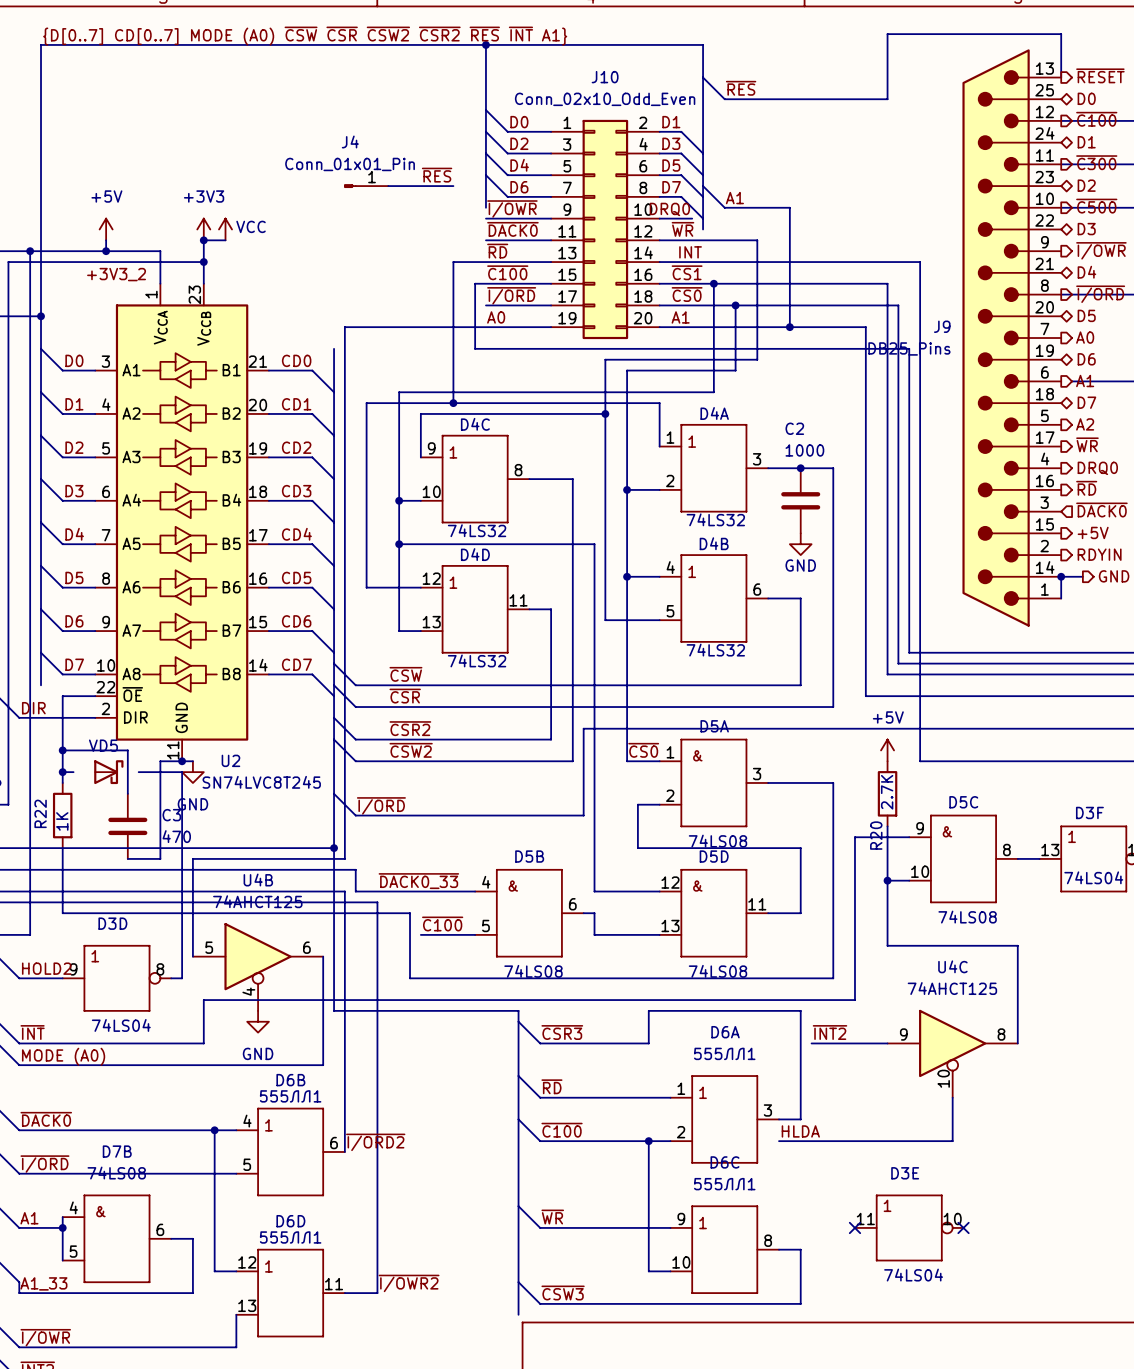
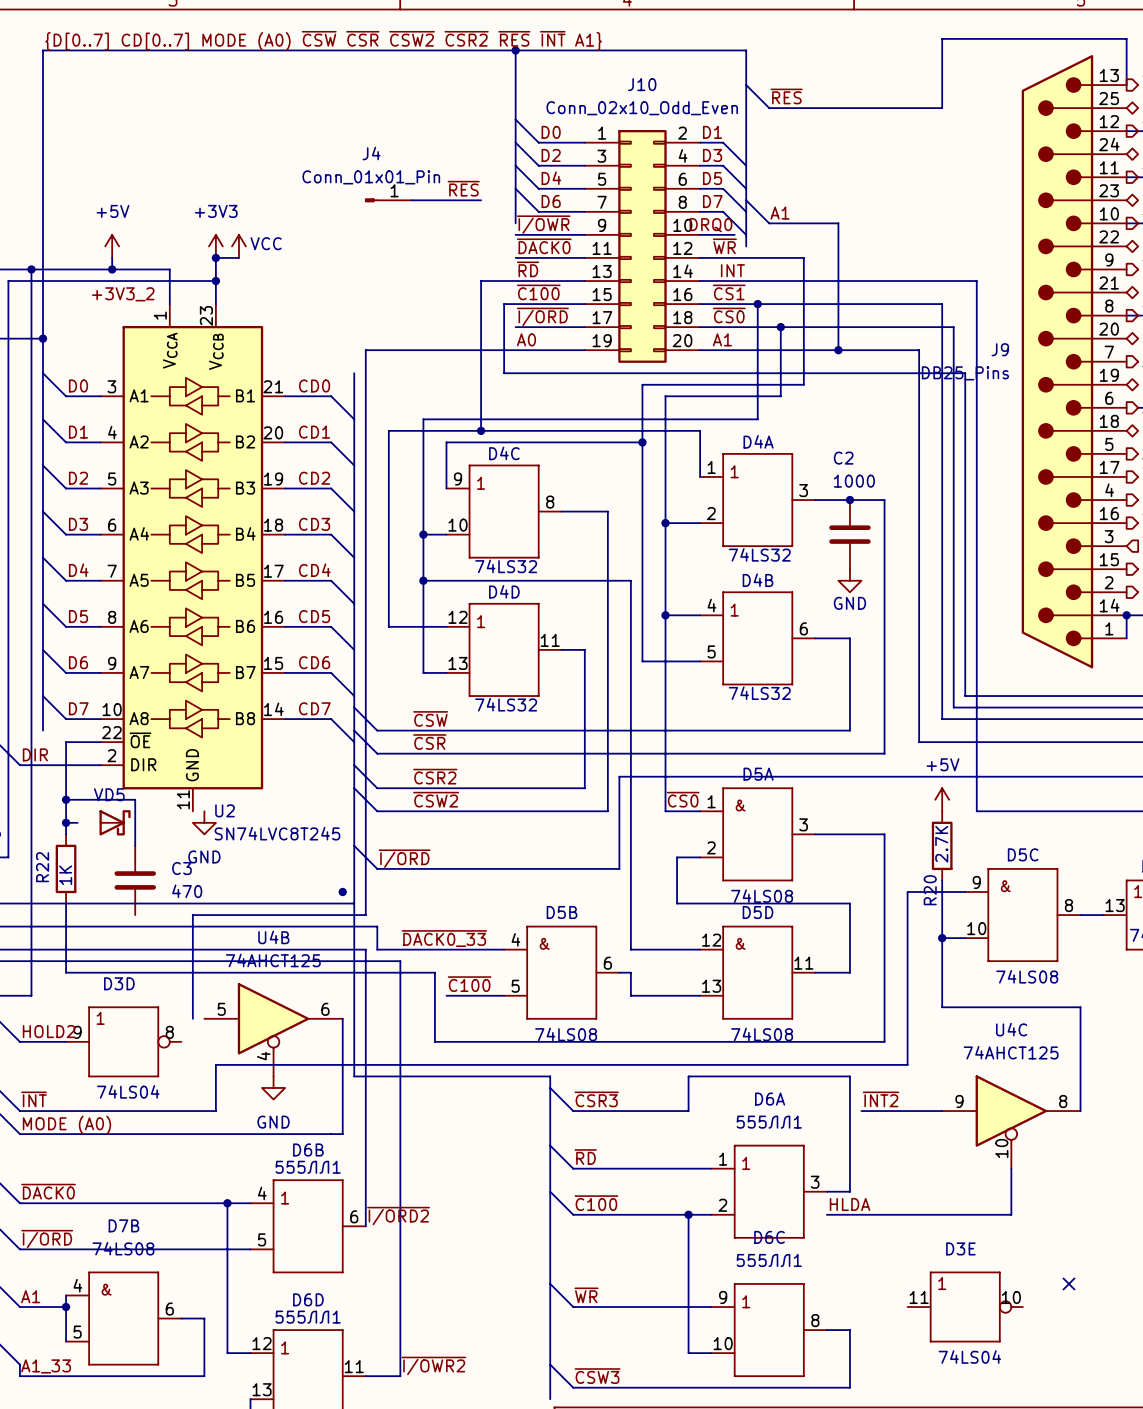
U2 name position: U2 (230, 760) -> U2 (225, 810)
junction: (182, 761) -> none
wire: (192, 761) (160, 761) (160, 858) (127, 858) -> none
wire: (138, 772) (182, 772) (182, 858) -> none
junction position: (334, 848) -> (342, 892)
wire: (192, 858) (192, 956) -> (204, 915) (192, 915)
wire: (182, 956) (182, 978) (171, 978) -> none
no-connect mark: (854, 1227) -> none
no-connect mark position: (963, 1227) -> (1068, 1283)

